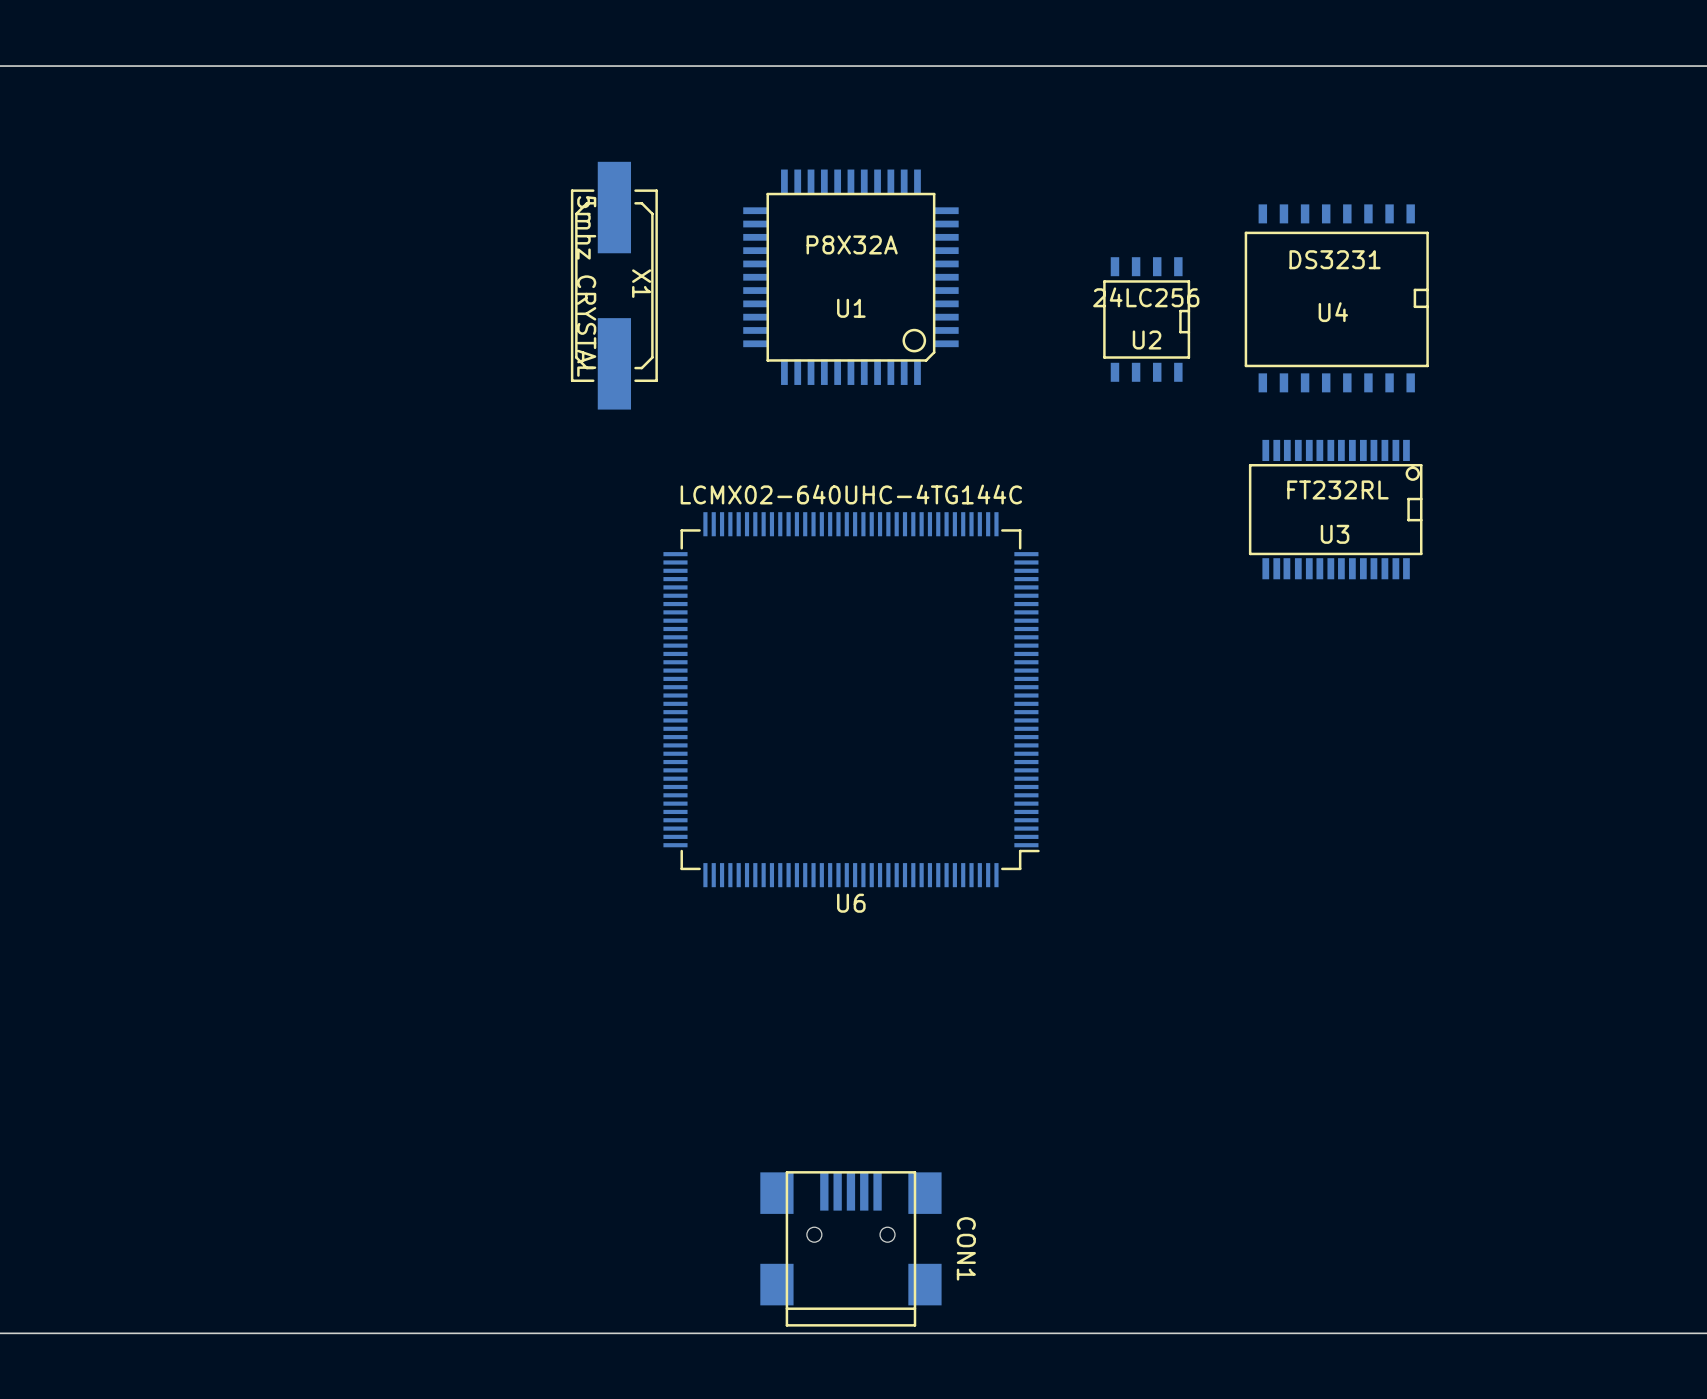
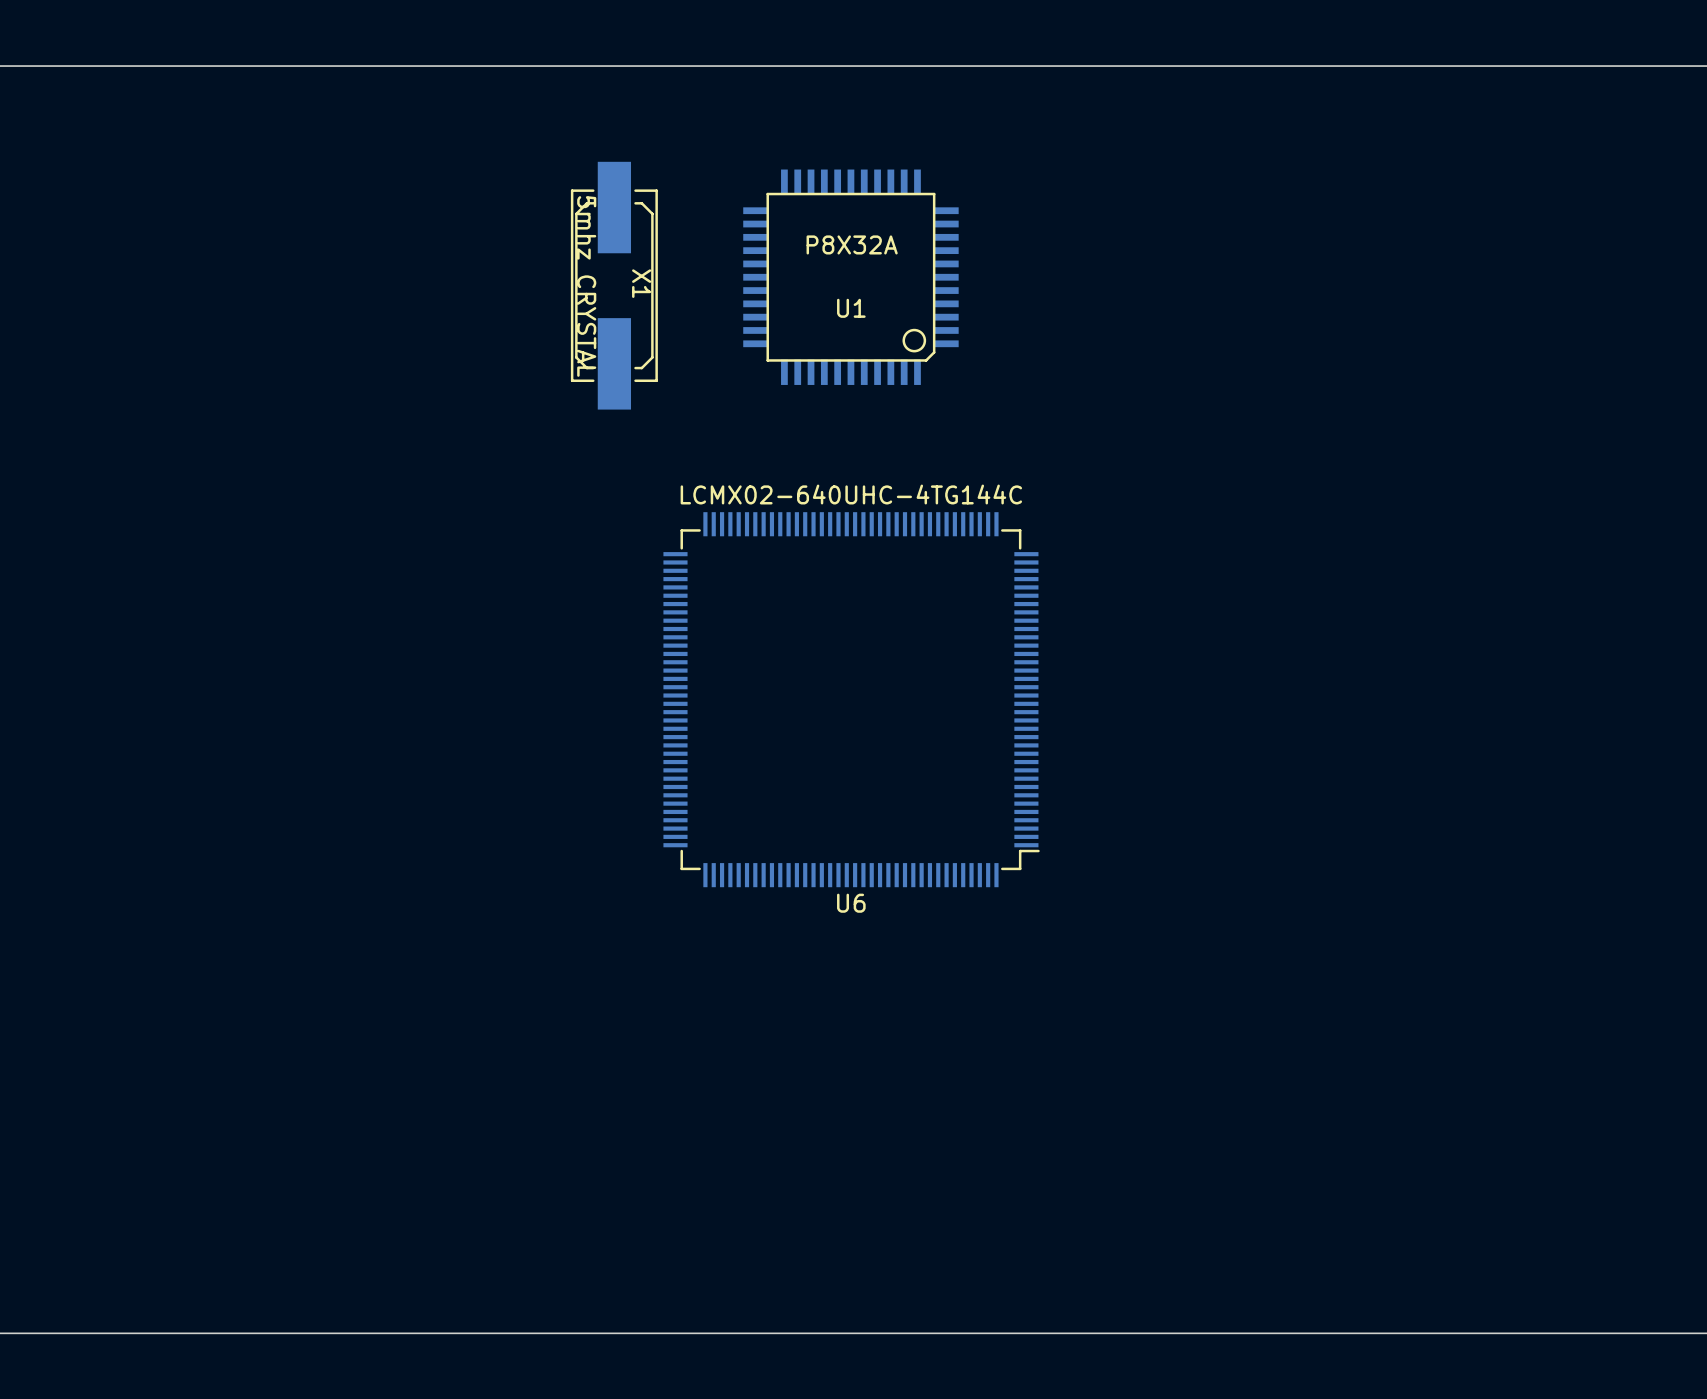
U4: DS3231 (1336, 298) -> none
U2: 24LC256 (1146, 319) -> none
U3: FT232RL (1335, 509) -> none
CON1: (850, 1248) -> none

